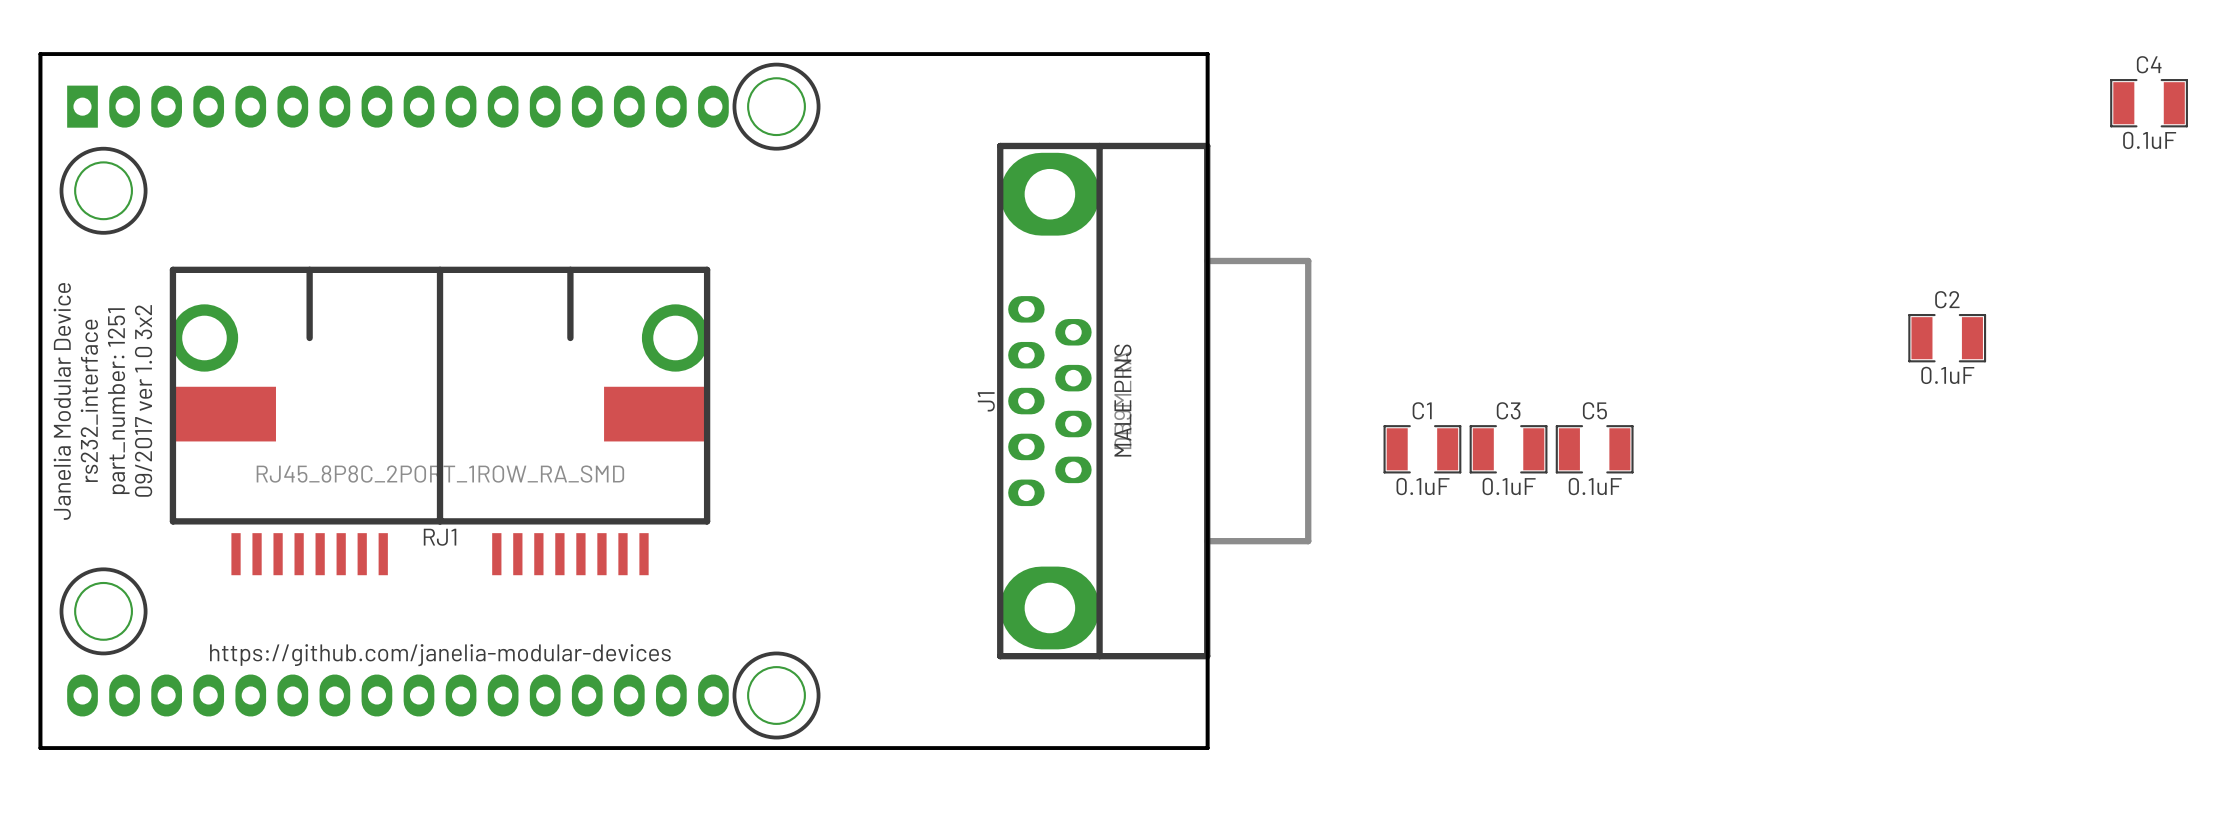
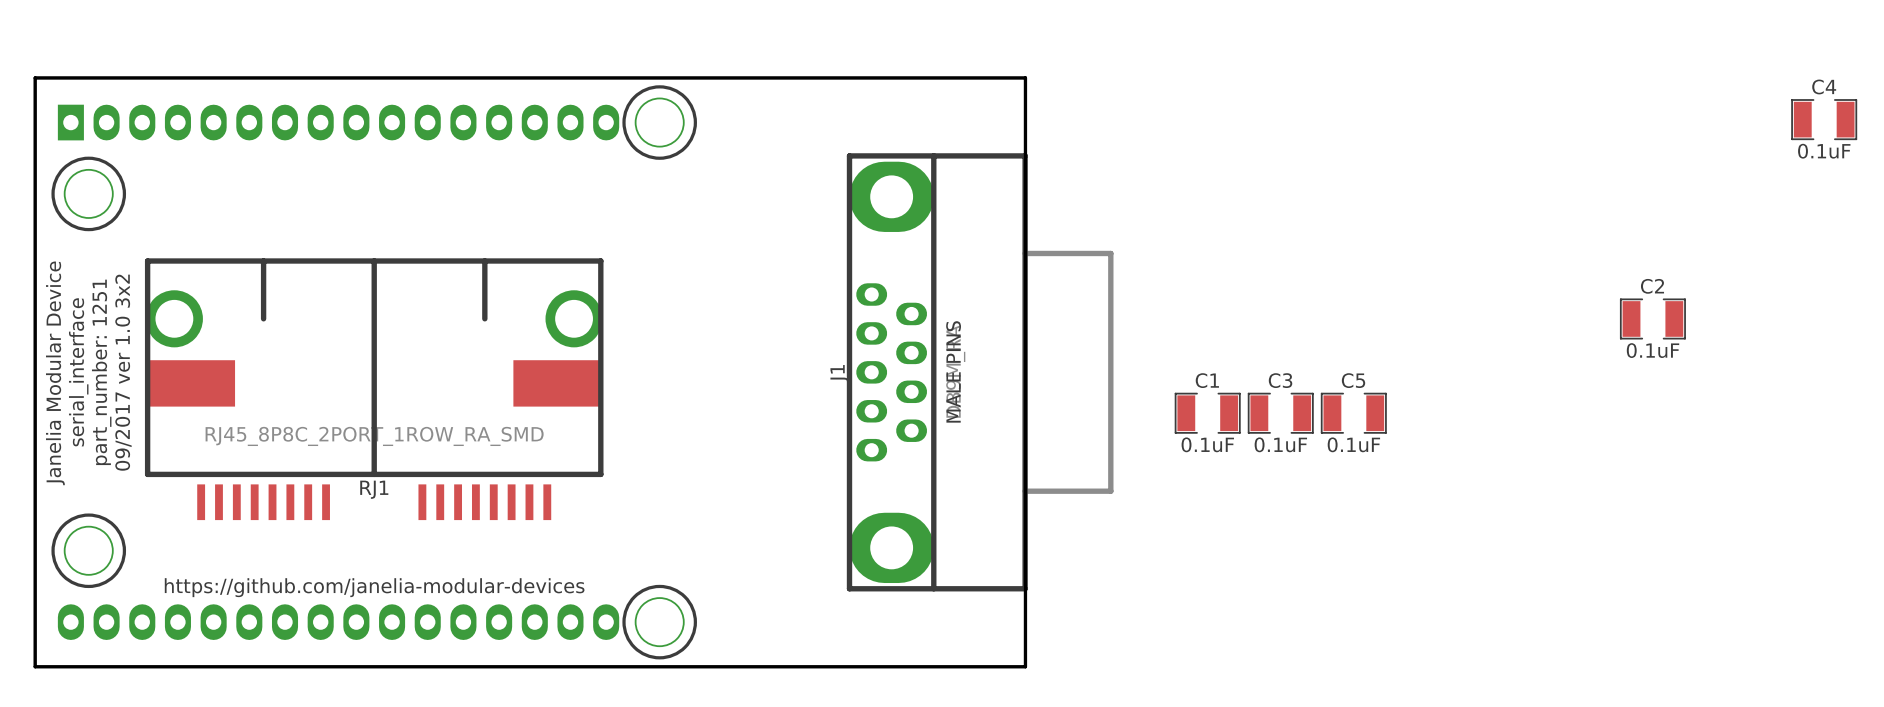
text: rs232_interface (89, 400) -> serial_interface (78, 372)

